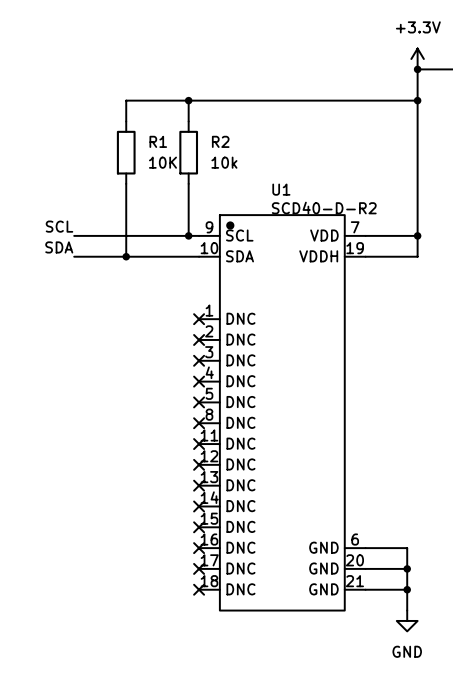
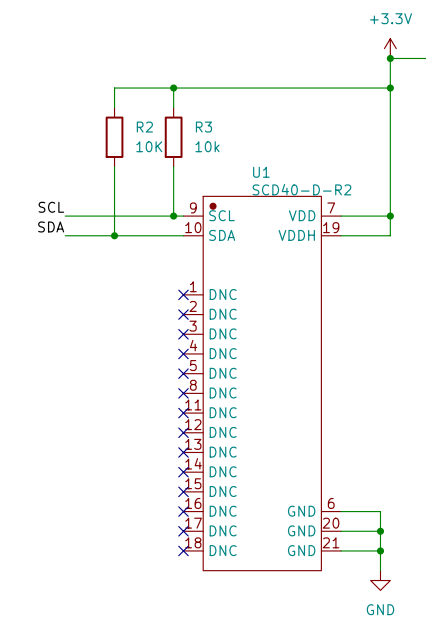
R1 name: R1 (158, 141) -> R2 (144, 127)
R2 name: R2 (220, 141) -> R3 (203, 127)

